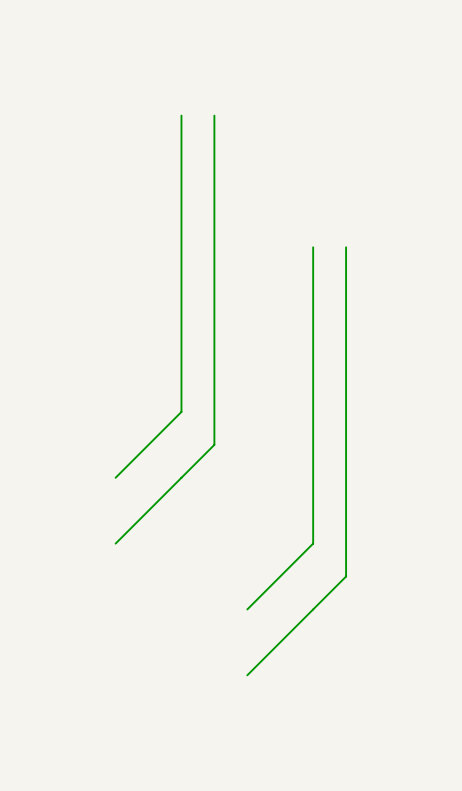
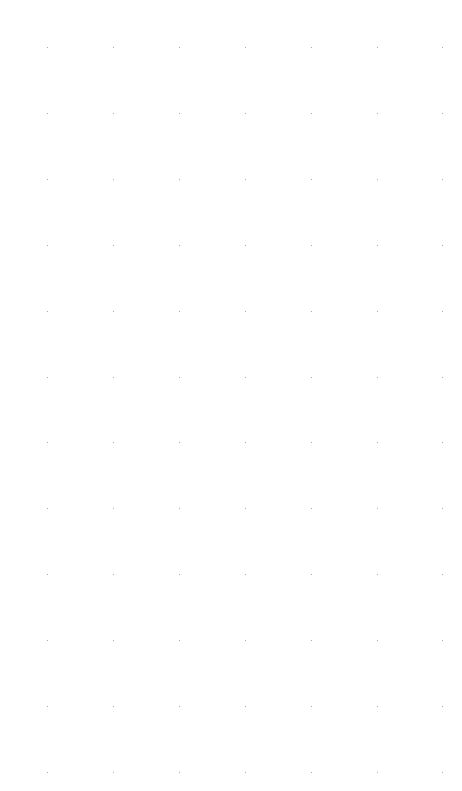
wire: (181, 115) (181, 411) (115, 477) -> none
wire: (214, 115) (214, 444) (115, 543) -> none
wire: (313, 247) (313, 543) (247, 609) -> none
wire: (346, 247) (346, 576) (247, 675) -> none

